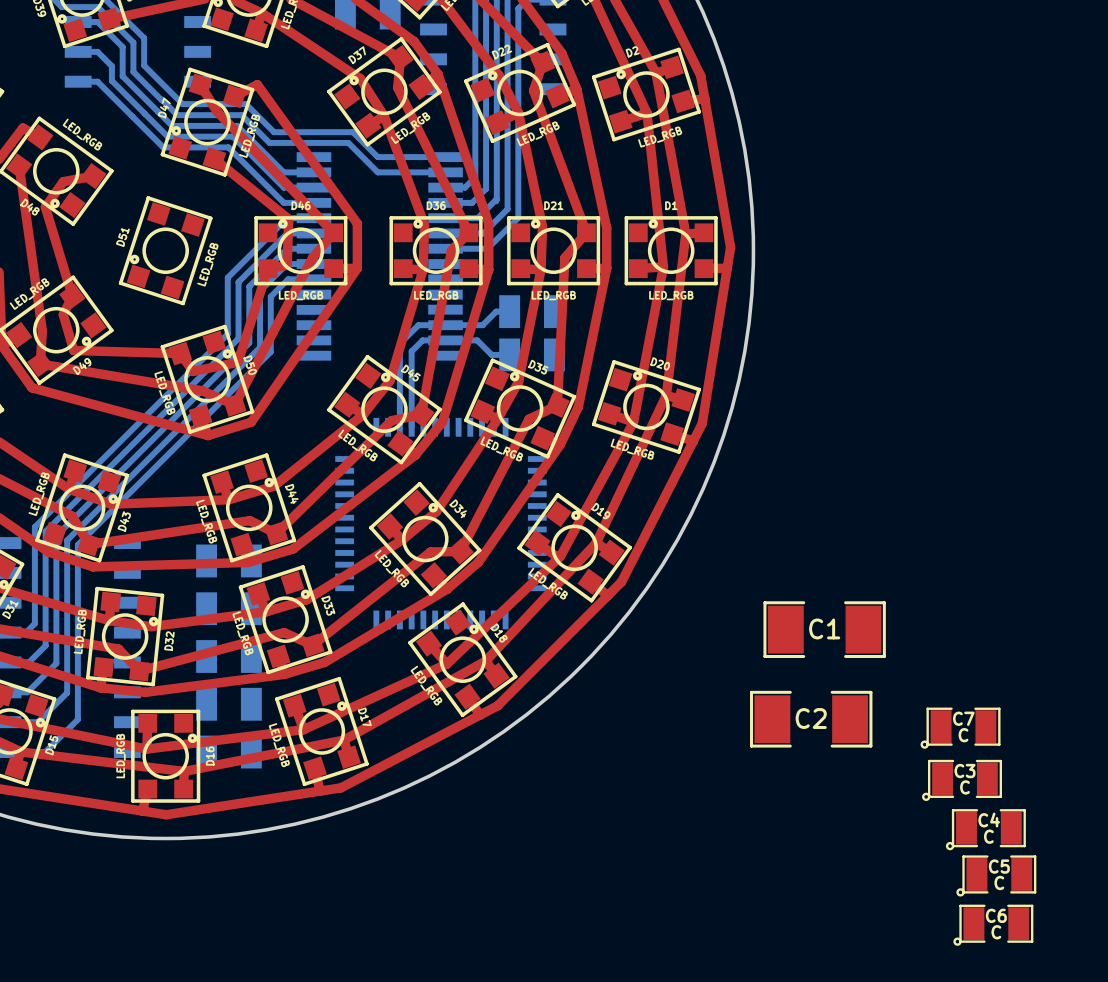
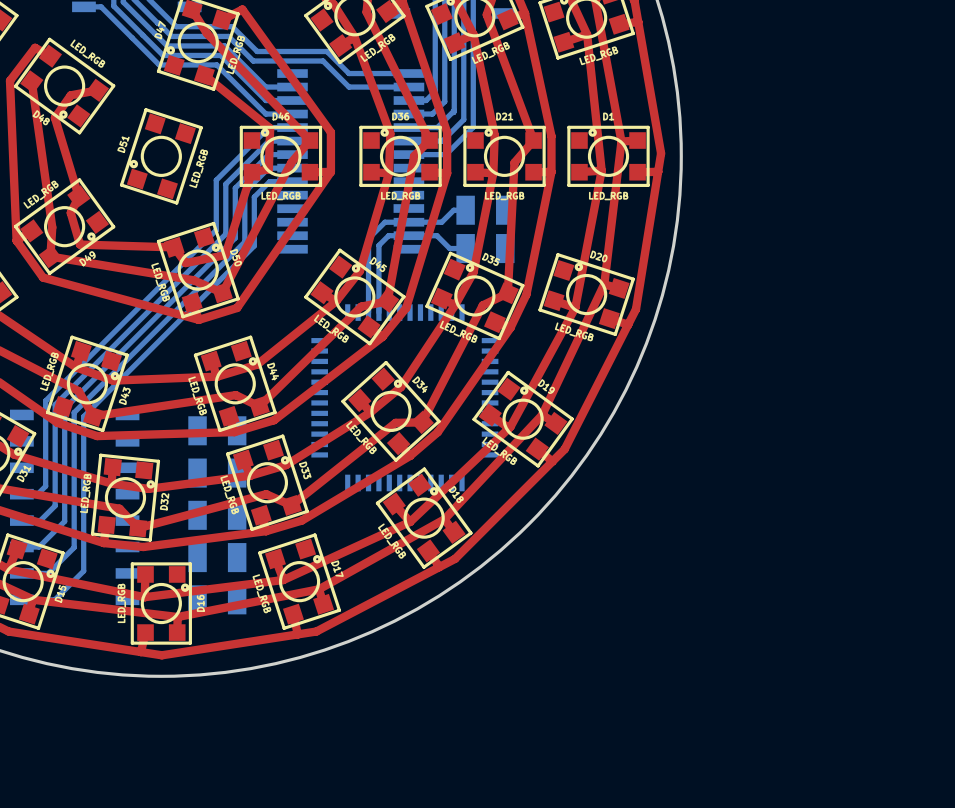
C1: (824, 629) -> none
C2: (811, 719) -> none
C7: C (960, 728) -> none
C3: C (962, 780) -> none
C4: C (985, 829) -> none
C5: C (996, 875) -> none
C6: C (993, 925) -> none

